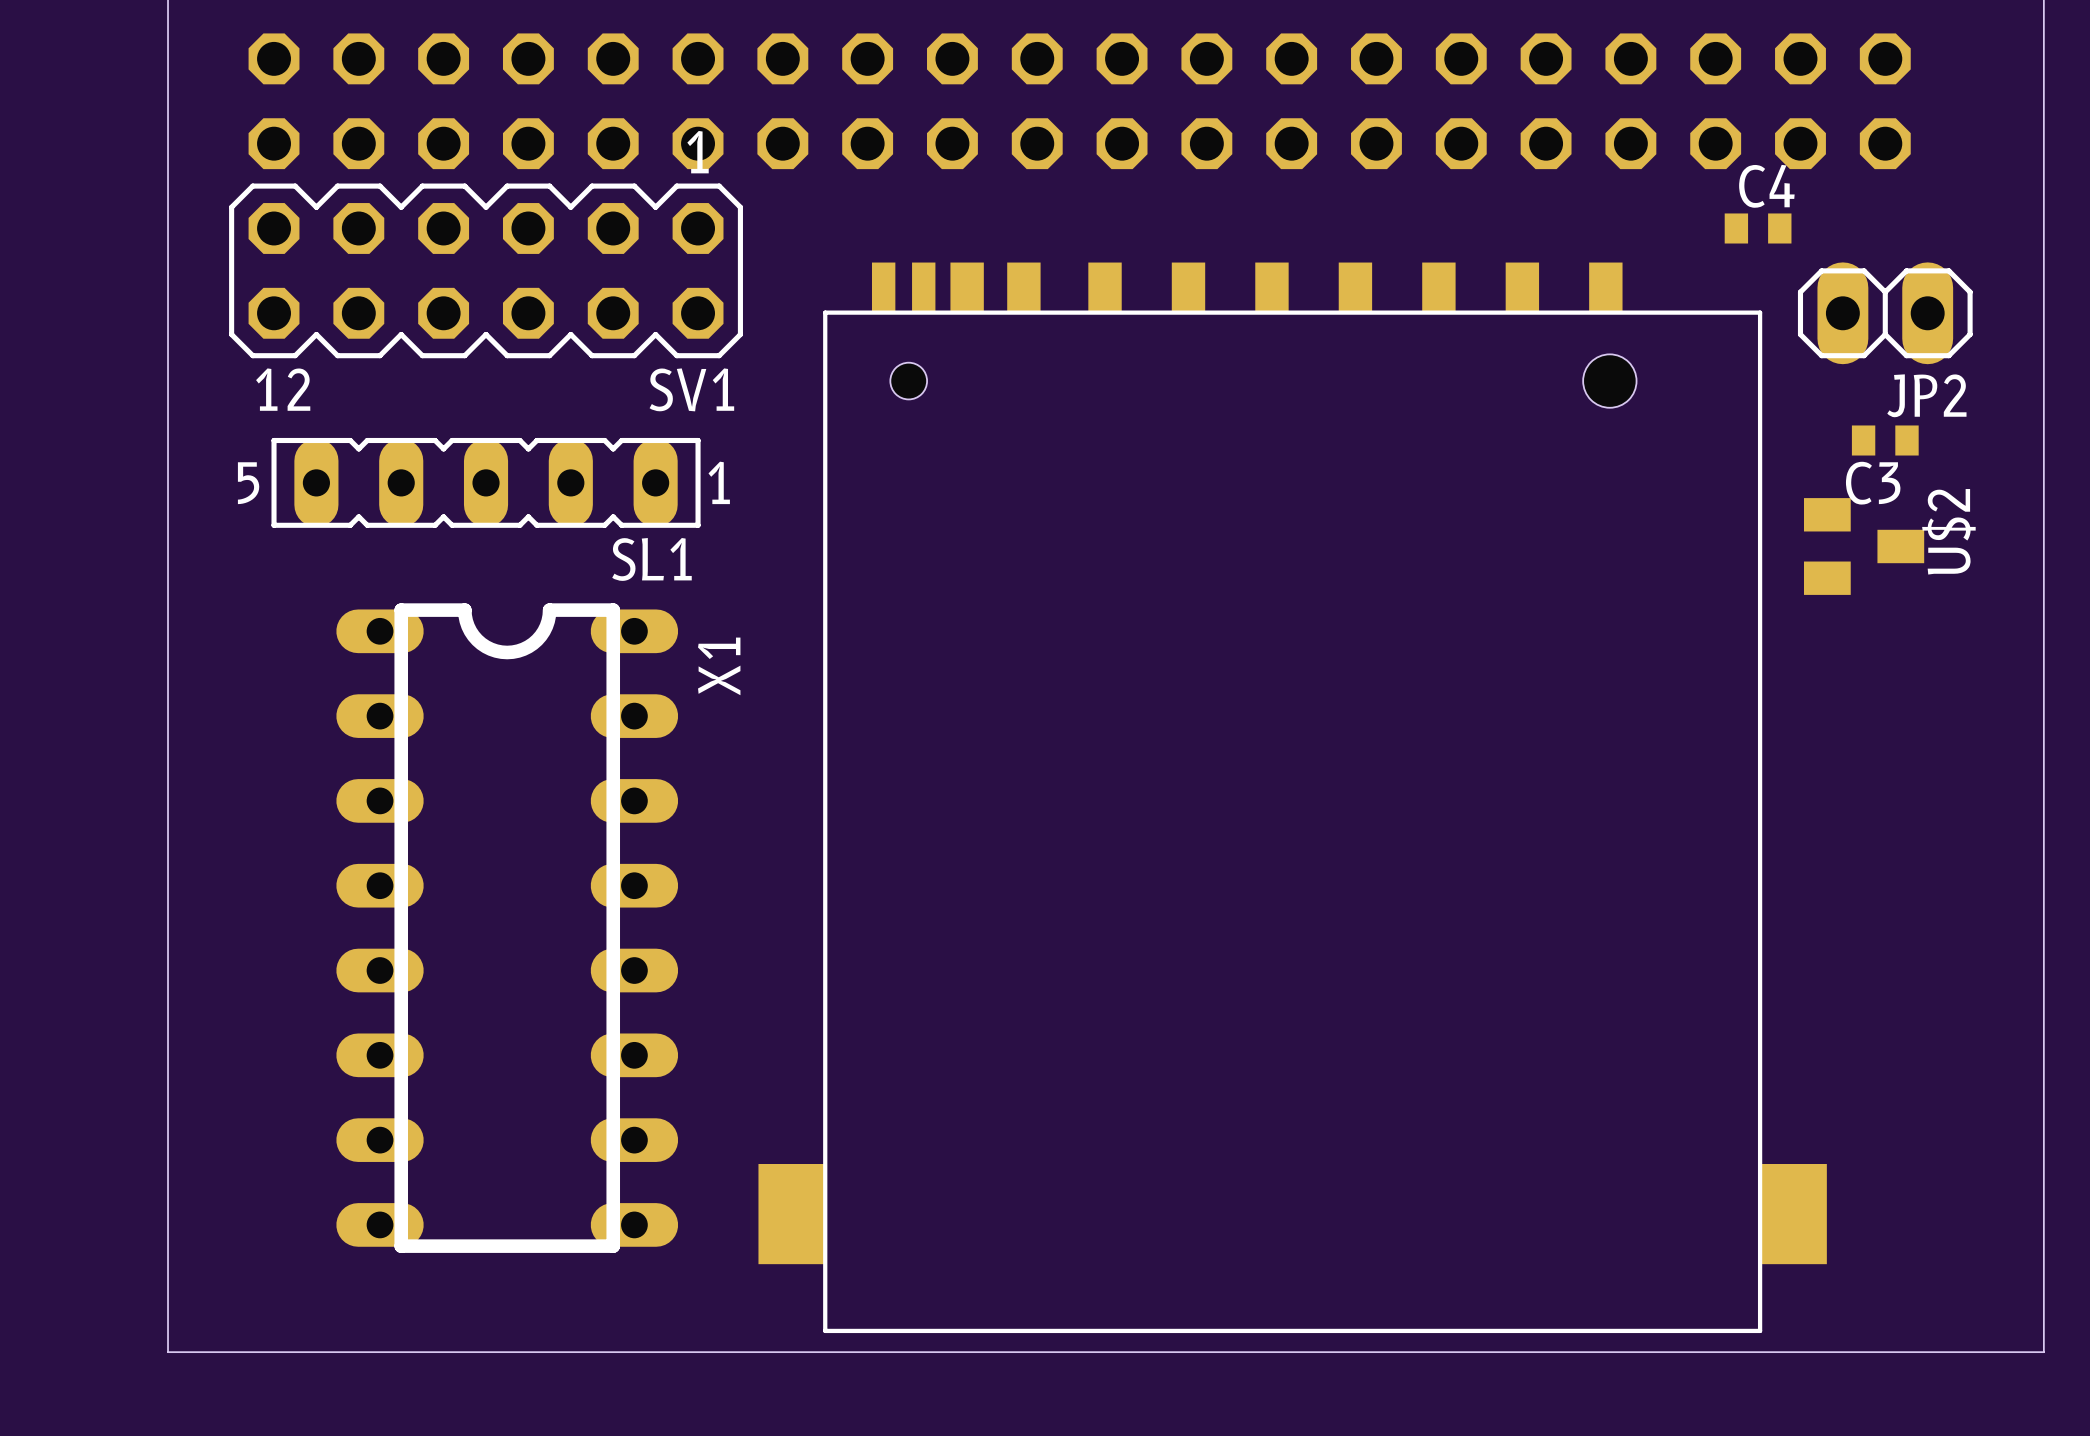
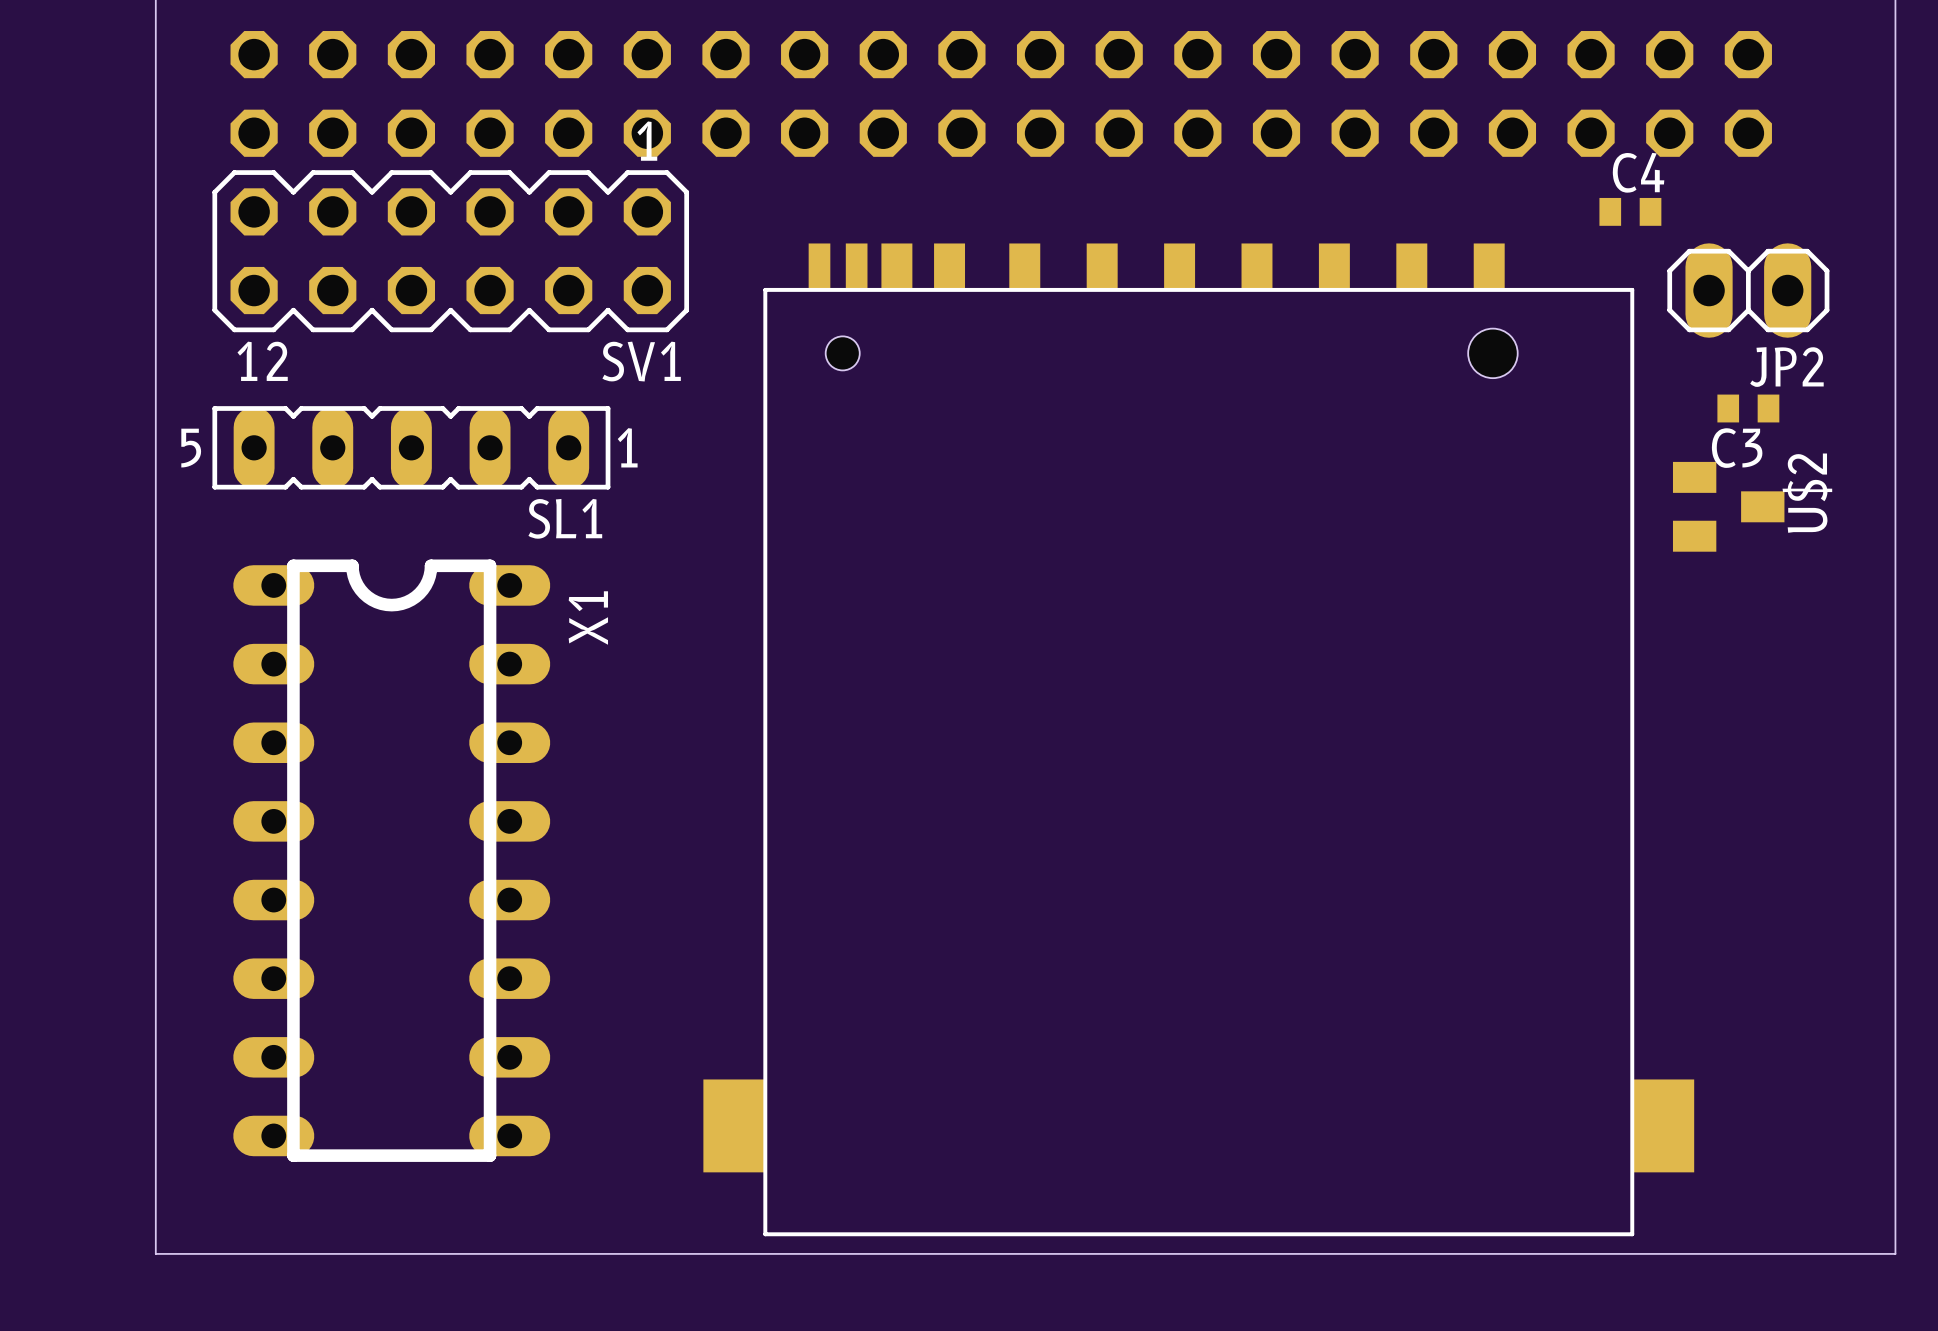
SL1 position: (486, 482) -> (411, 447)
X1 position: (507, 928) -> (391, 860)

